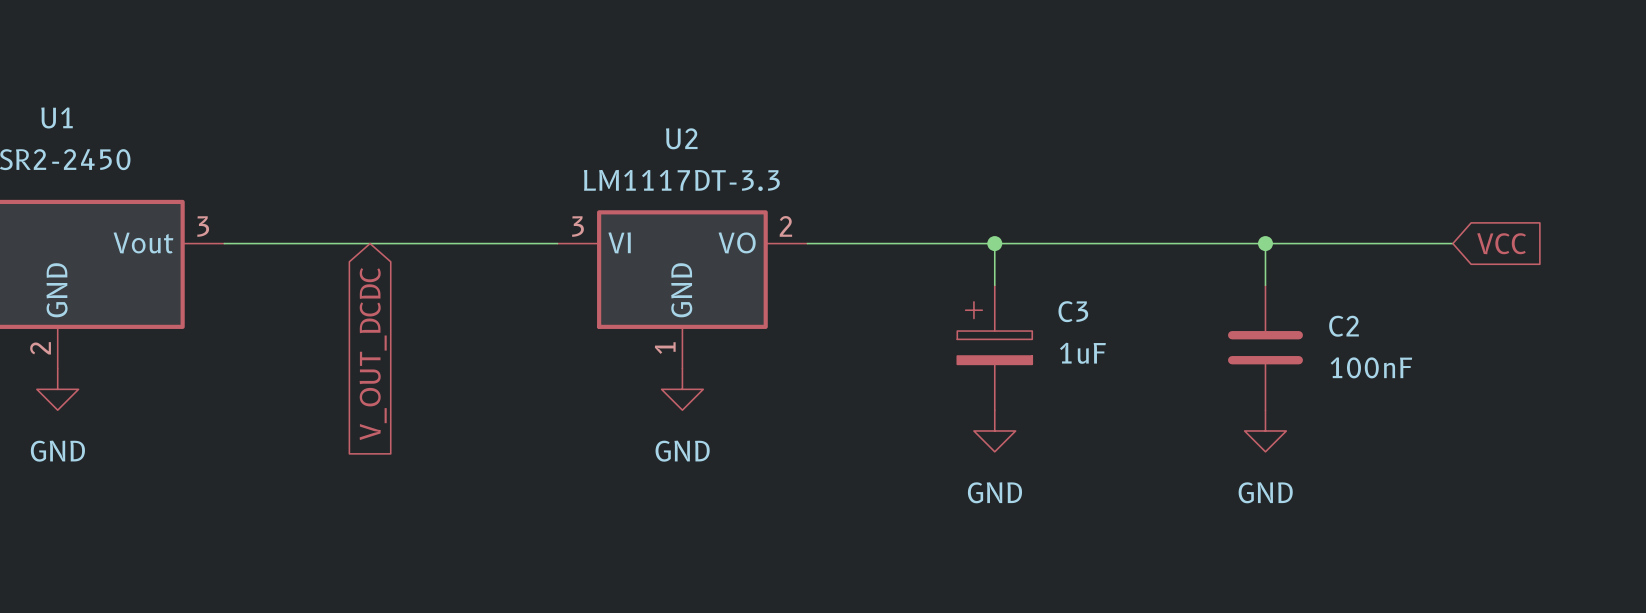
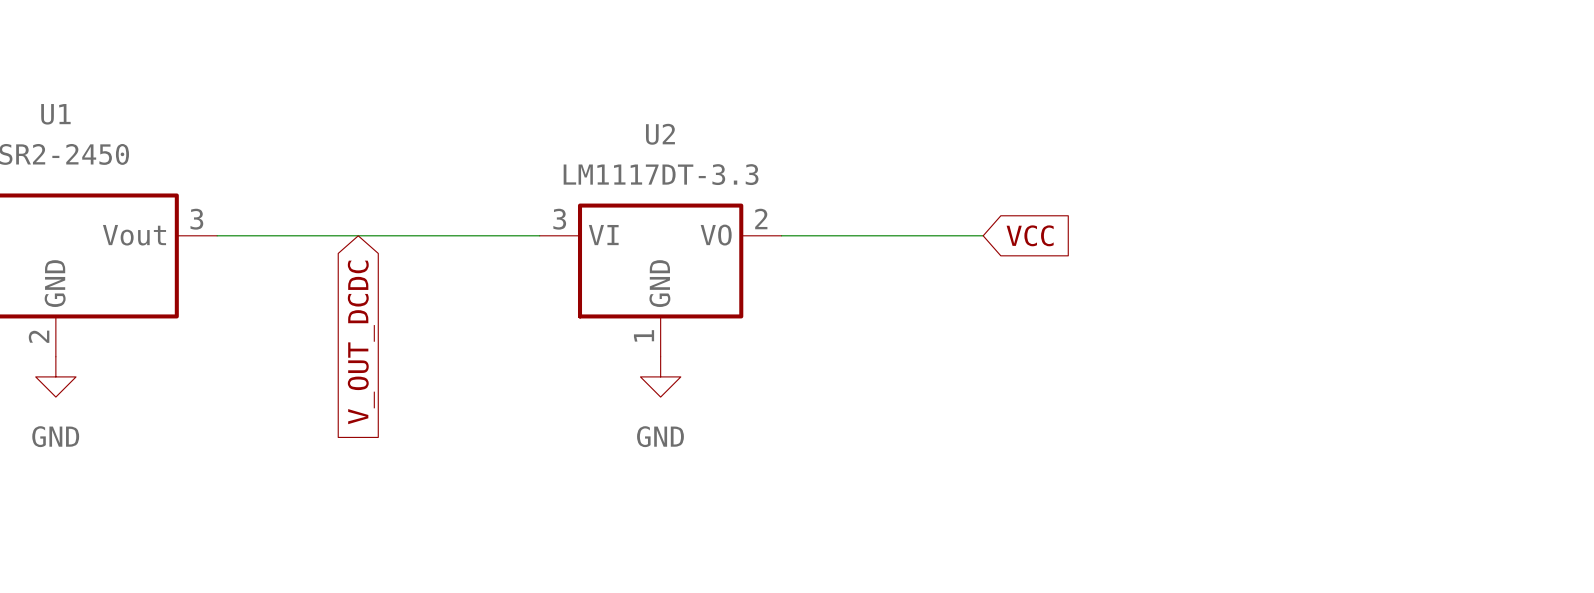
wire: (994, 243) (994, 285) -> none
junction: (994, 243) -> none
wire: (1015, 243) (1452, 243) -> none
global label: none -> VCC (1030, 235)
wire: (1265, 243) (1265, 285) -> none
junction: (1265, 243) -> none
global label: VCC (1501, 243) -> none
C3: 1uF (994, 347) -> none
C2: 100nF (1265, 347) -> none
power symbol: GND (994, 430) -> none
power symbol: GND (1265, 430) -> none

